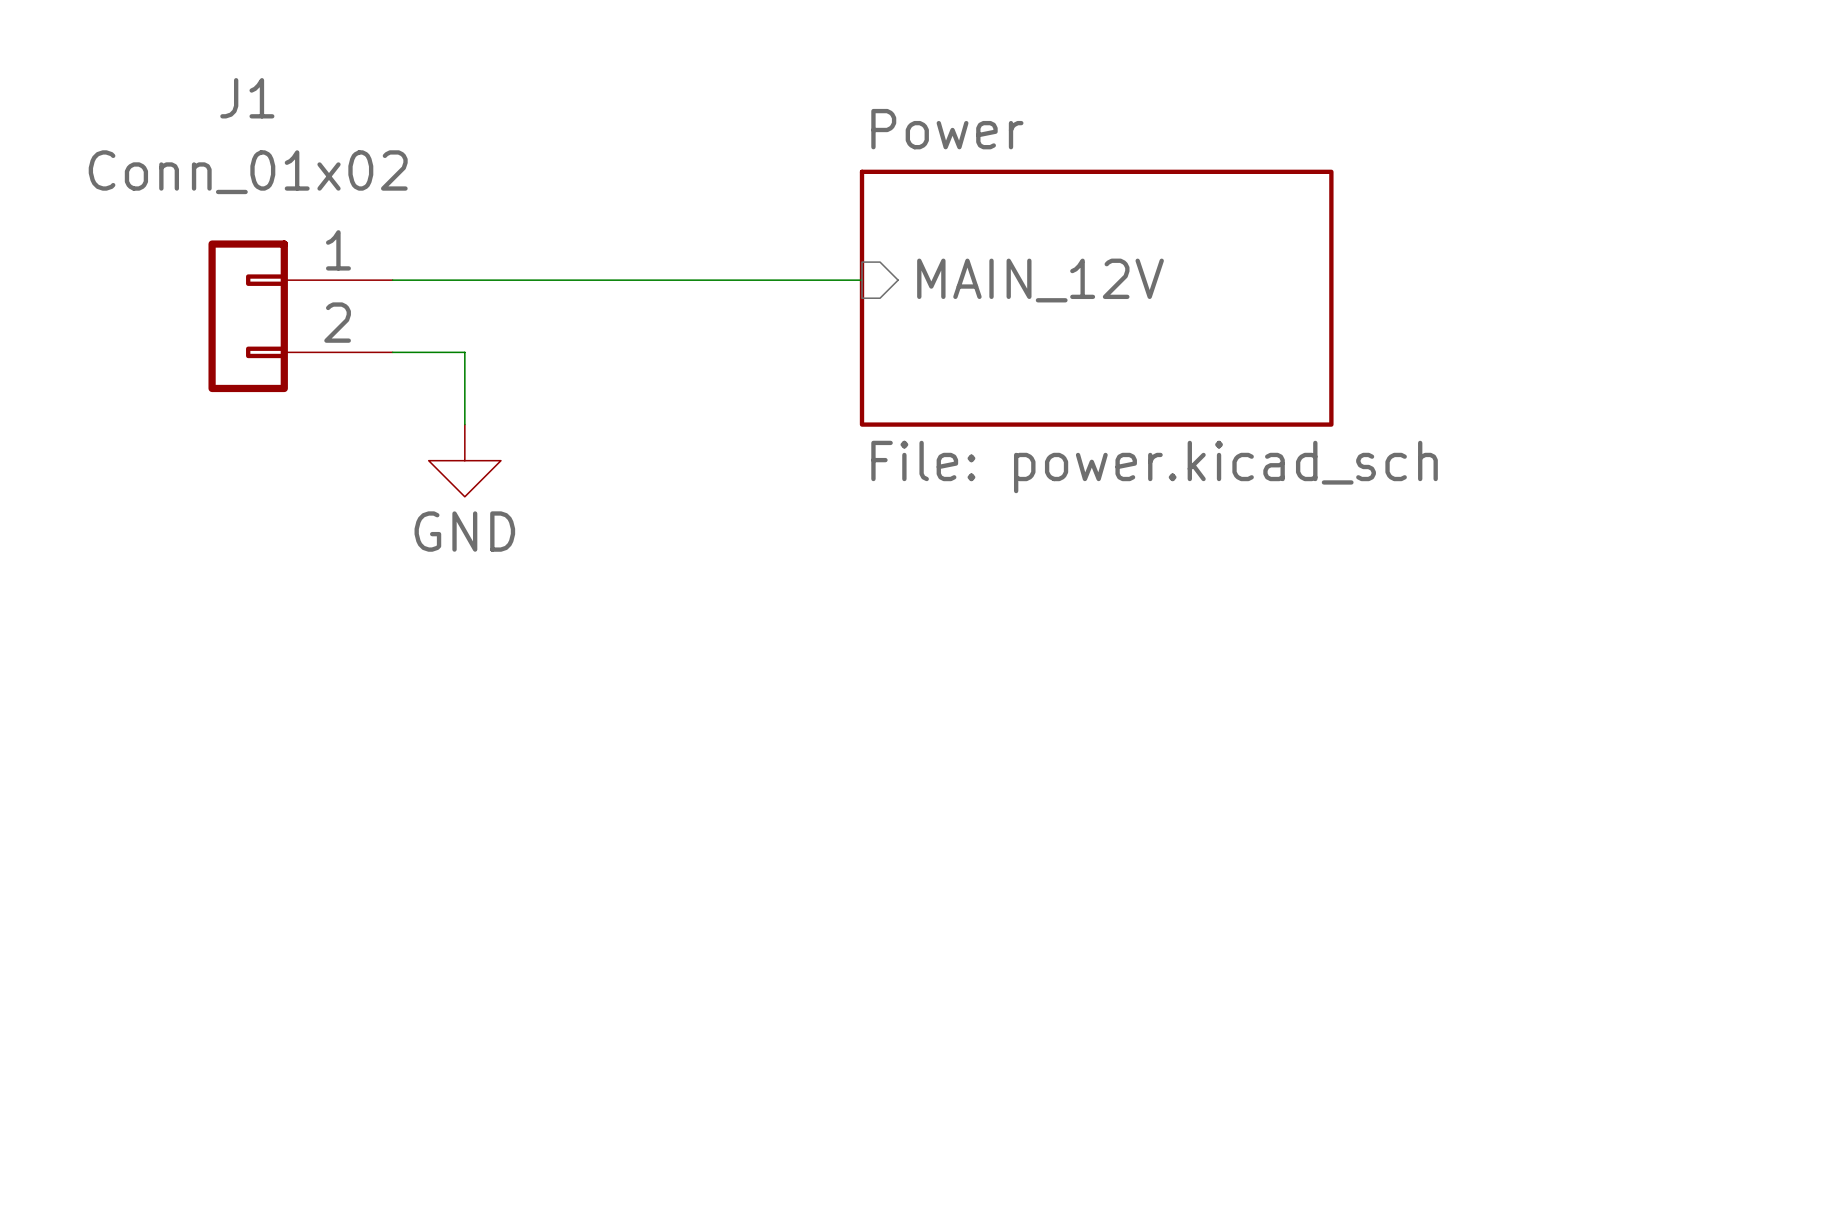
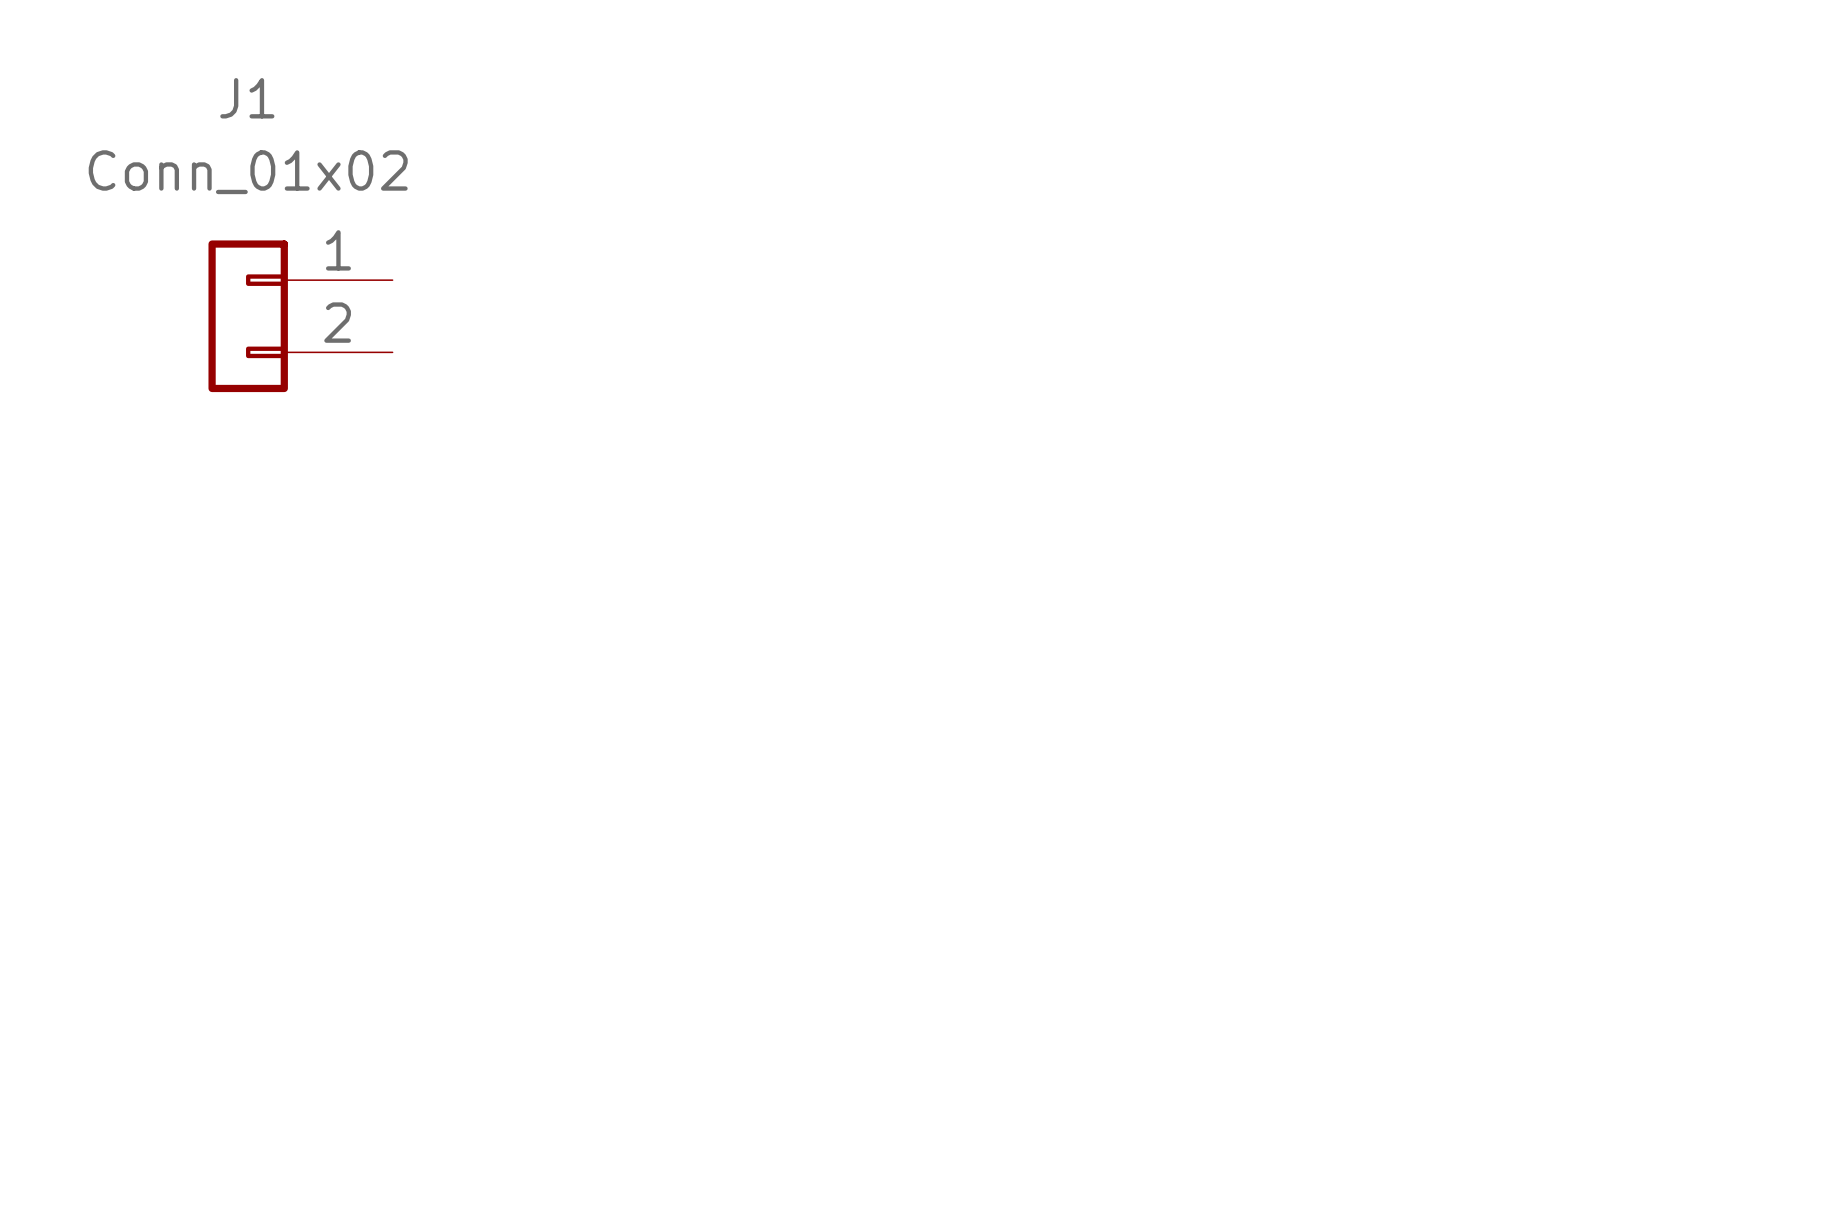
wire: (392, 280) (862, 280) -> none
sheet pin: MAIN_12V (1040, 280) -> none
sheet Power: File: power.kicad_sch (1096, 298) -> none
wire: (392, 352) (464, 352) (464, 424) -> none
power symbol: GND (464, 460) -> none

